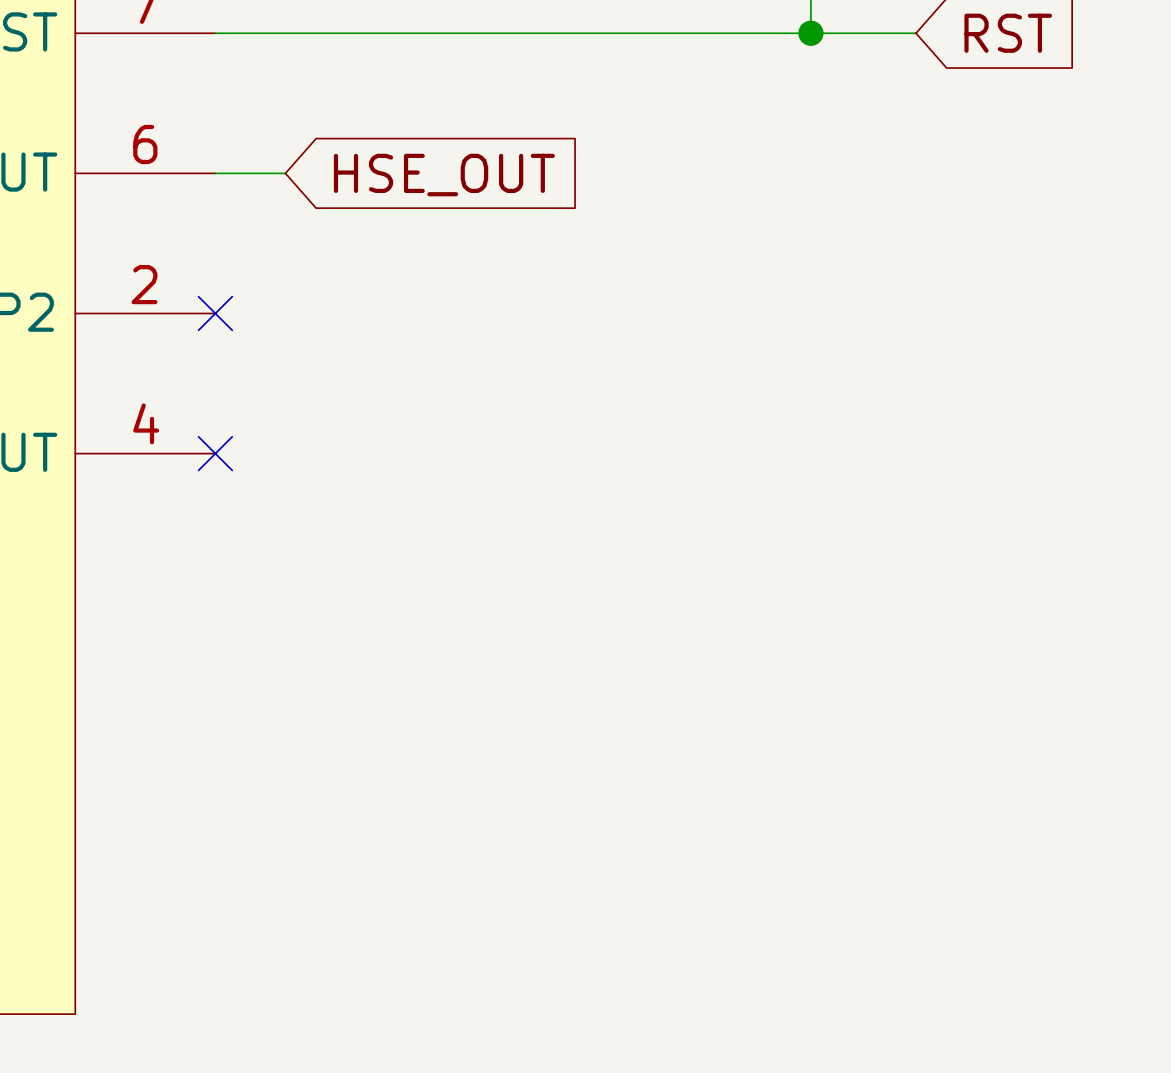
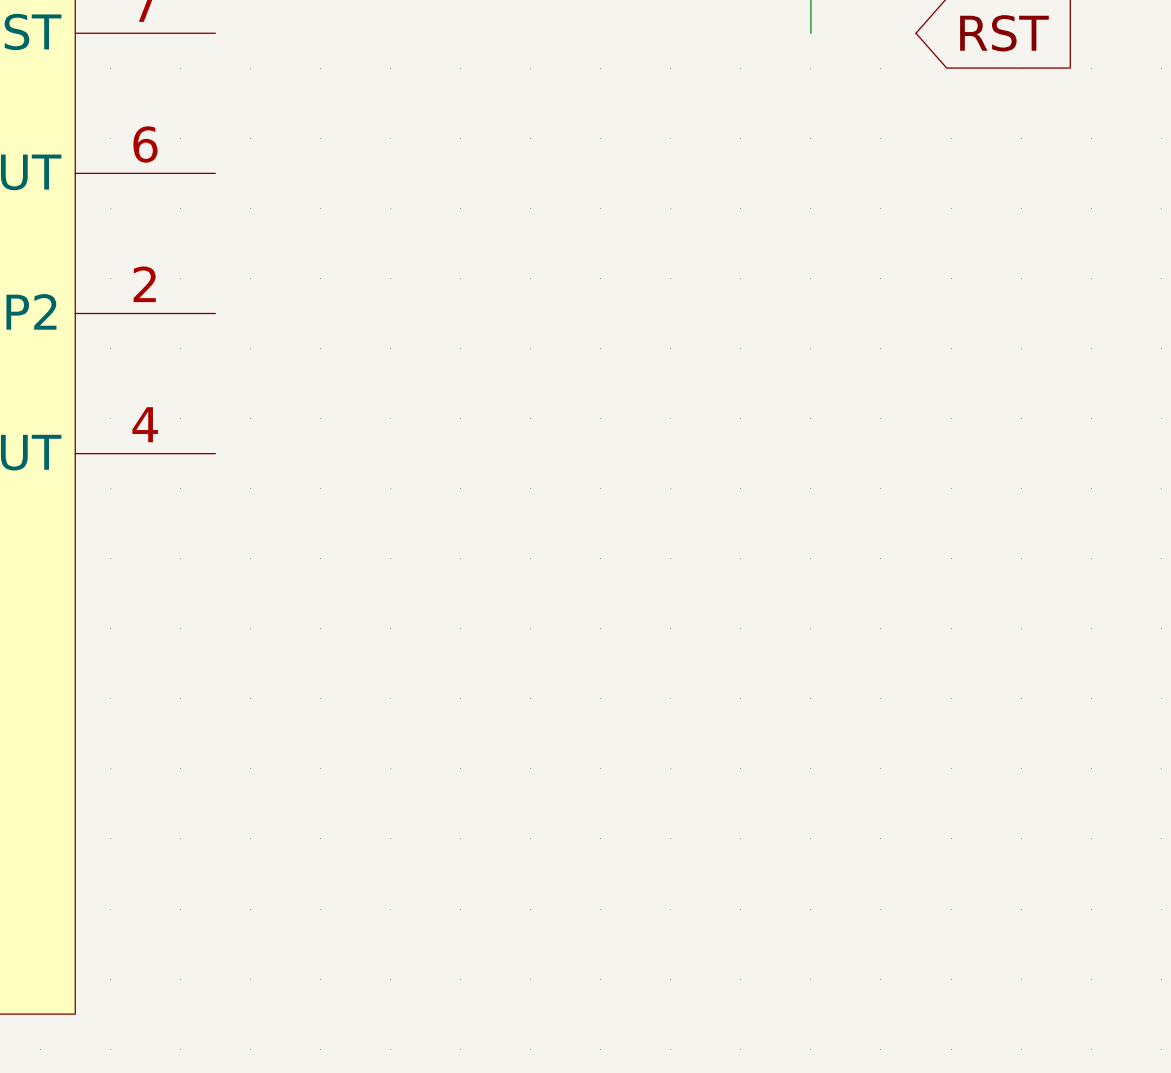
wire: (215, 33) (916, 33) -> none
junction: (810, 33) -> none
wire: (215, 173) (285, 173) -> none
global label: HSE_OUT (444, 175) -> none
no-connect mark: (215, 313) -> none
no-connect mark: (215, 453) -> none

